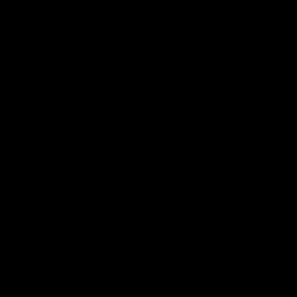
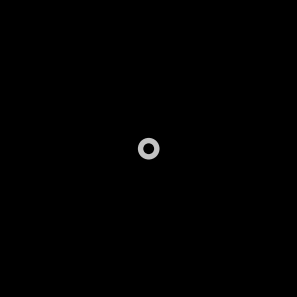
via: none -> (148, 148)

